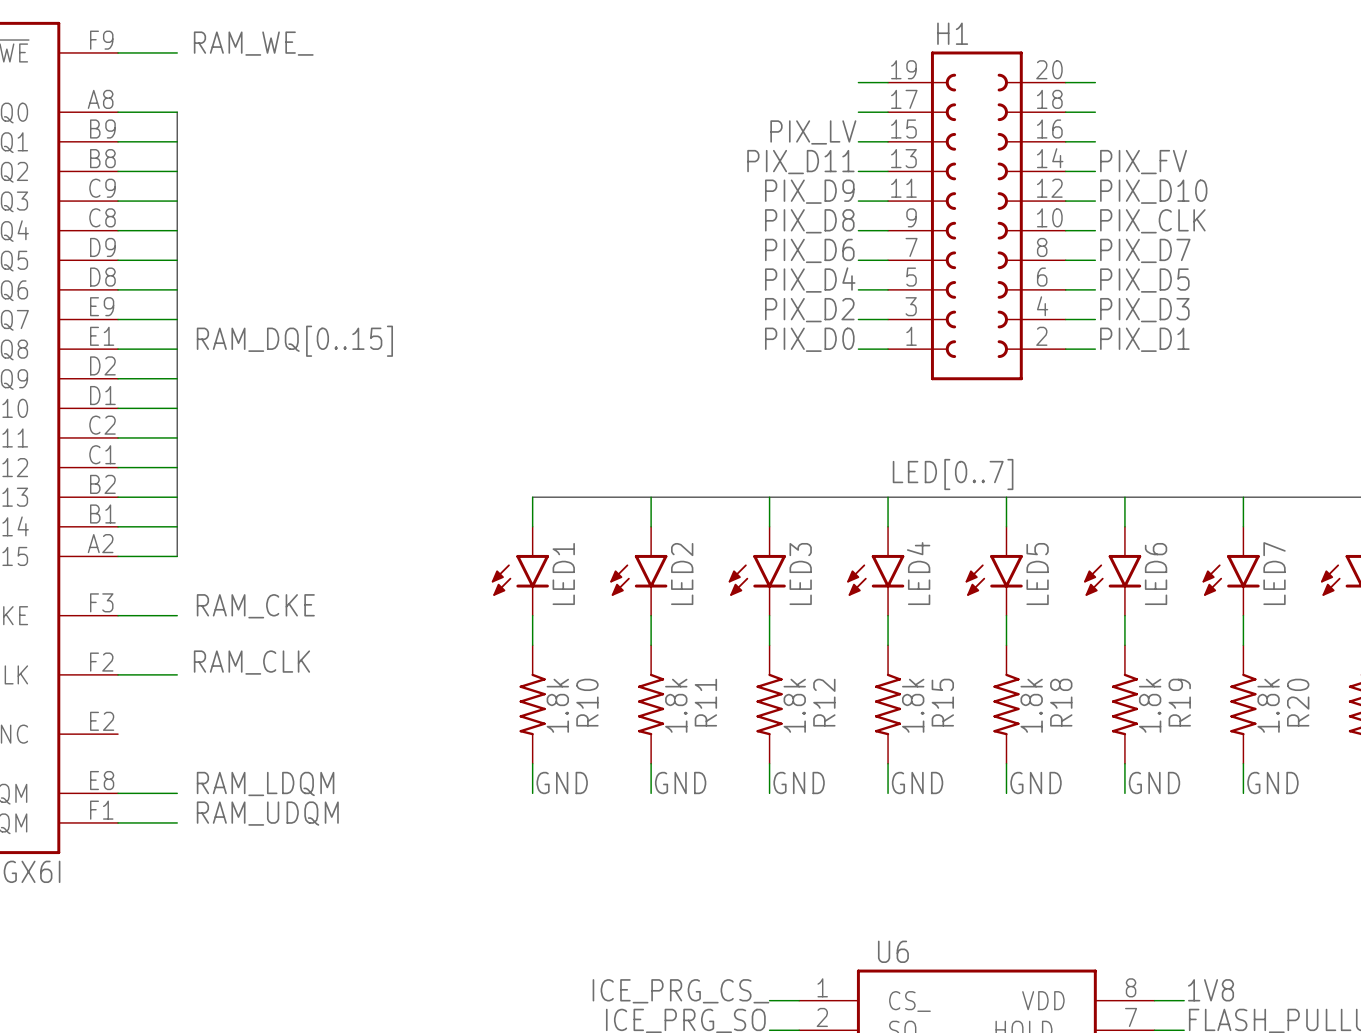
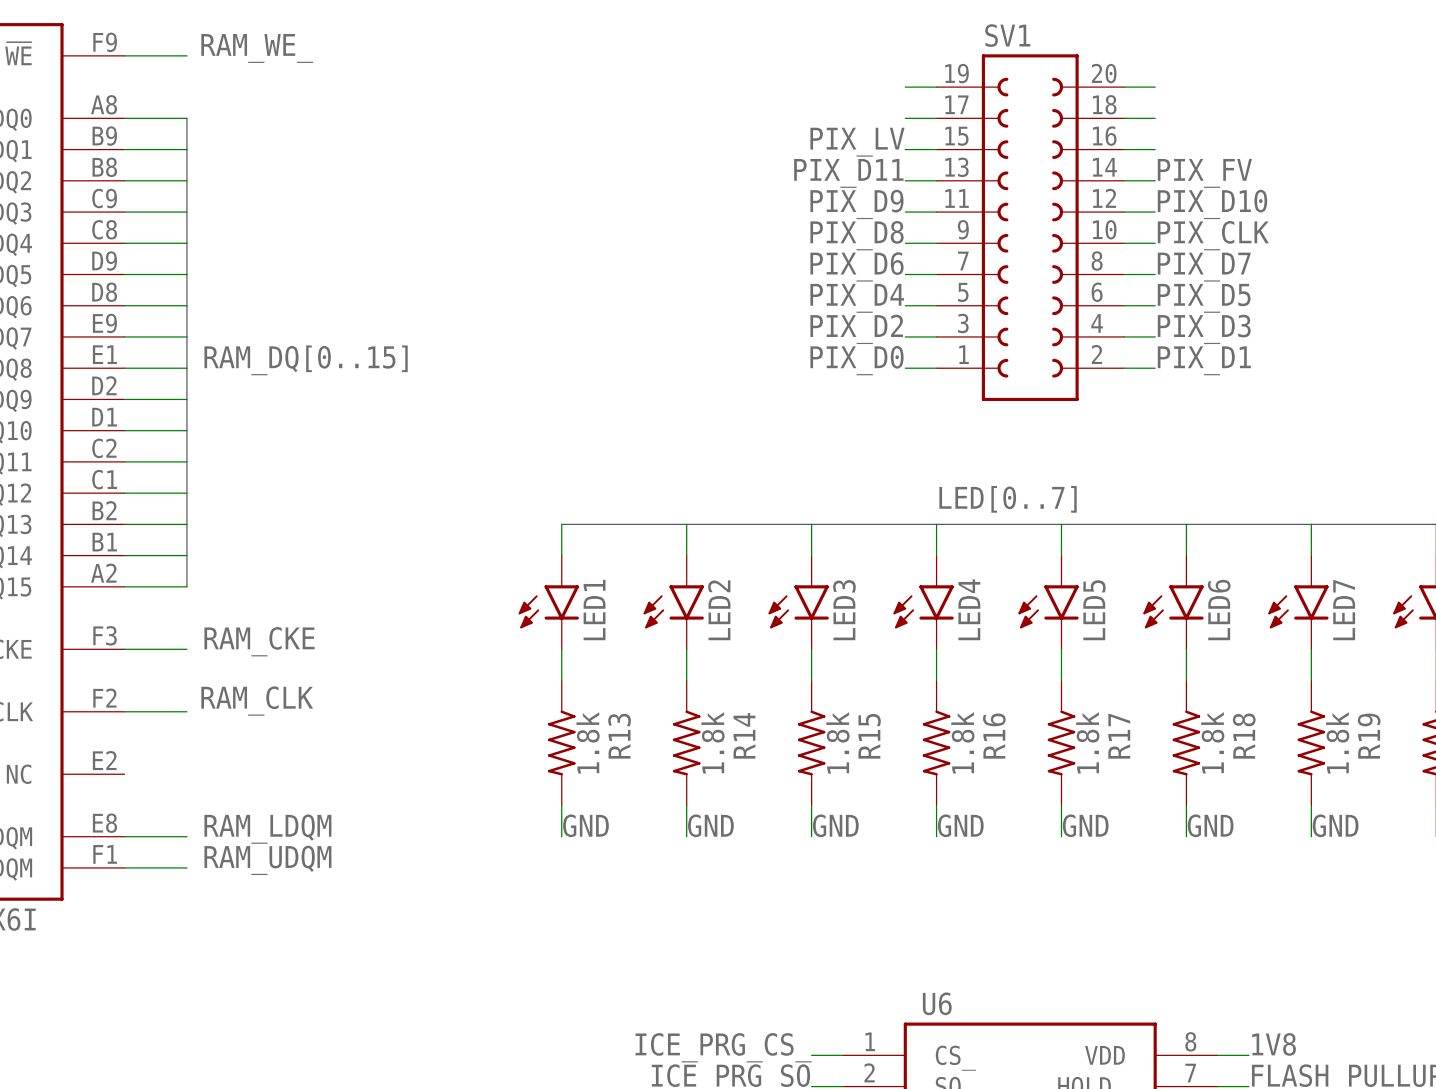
H1 name: H1 (952, 33) -> SV1 (1007, 35)
R10 name: R10 (587, 702) -> R13 (619, 736)
R11 name: R11 (705, 702) -> R14 (744, 735)
R12 name: R12 (824, 702) -> R15 (869, 736)
R15 name: R15 (942, 702) -> R16 (994, 736)
R18 name: R18 (1061, 702) -> R17 (1119, 736)
R19 name: R19 (1179, 702) -> R18 (1244, 736)
R20 name: R20 (1298, 702) -> R19 (1369, 736)

